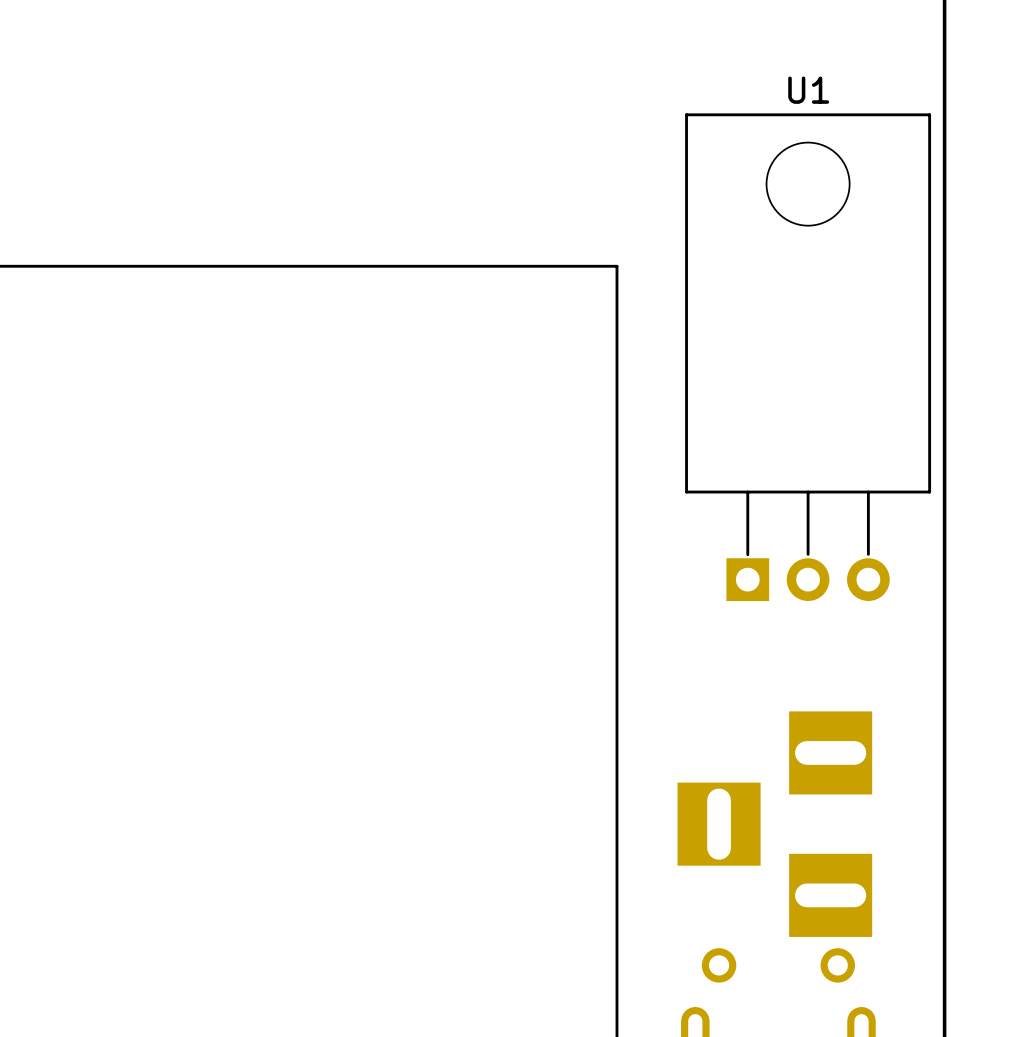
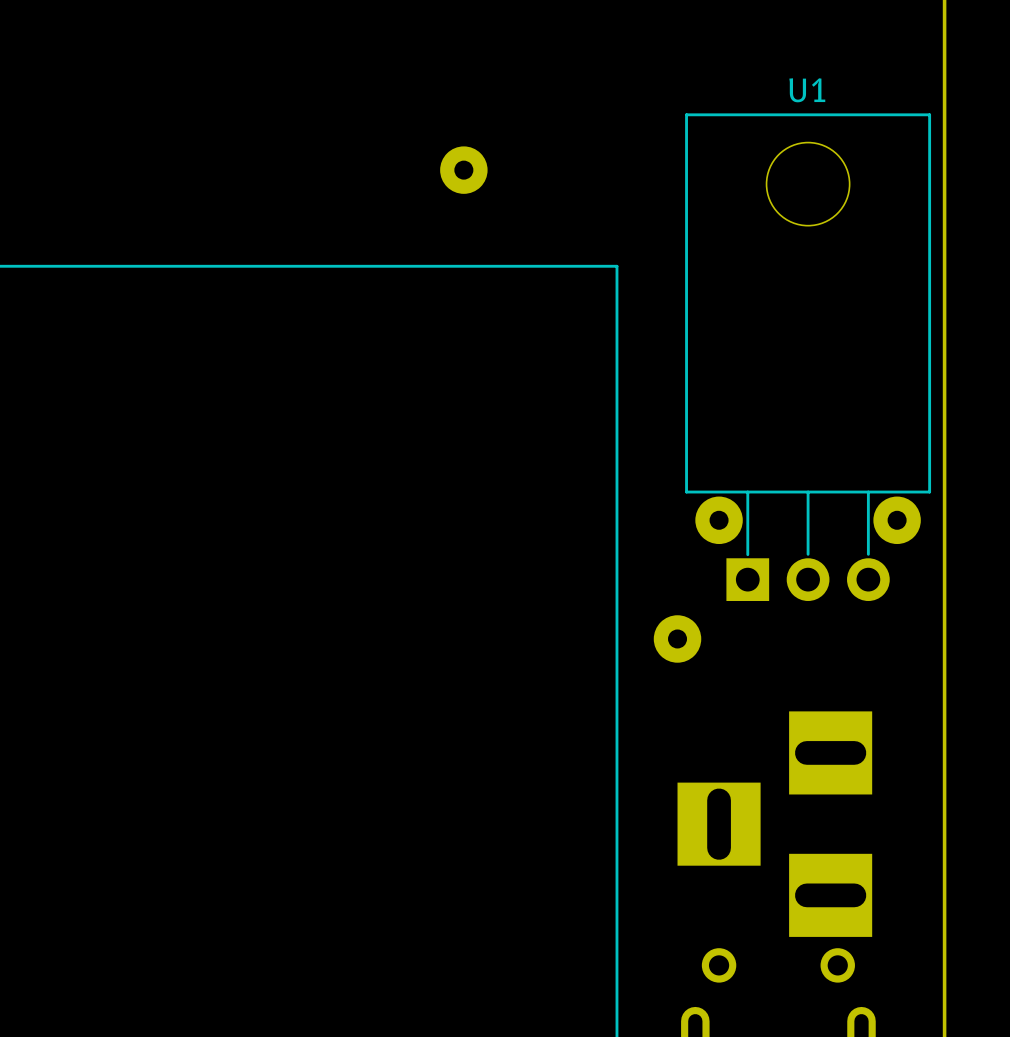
part: none -> (463, 170)
part: none -> (719, 520)
part: none -> (897, 520)
part: none -> (677, 638)

